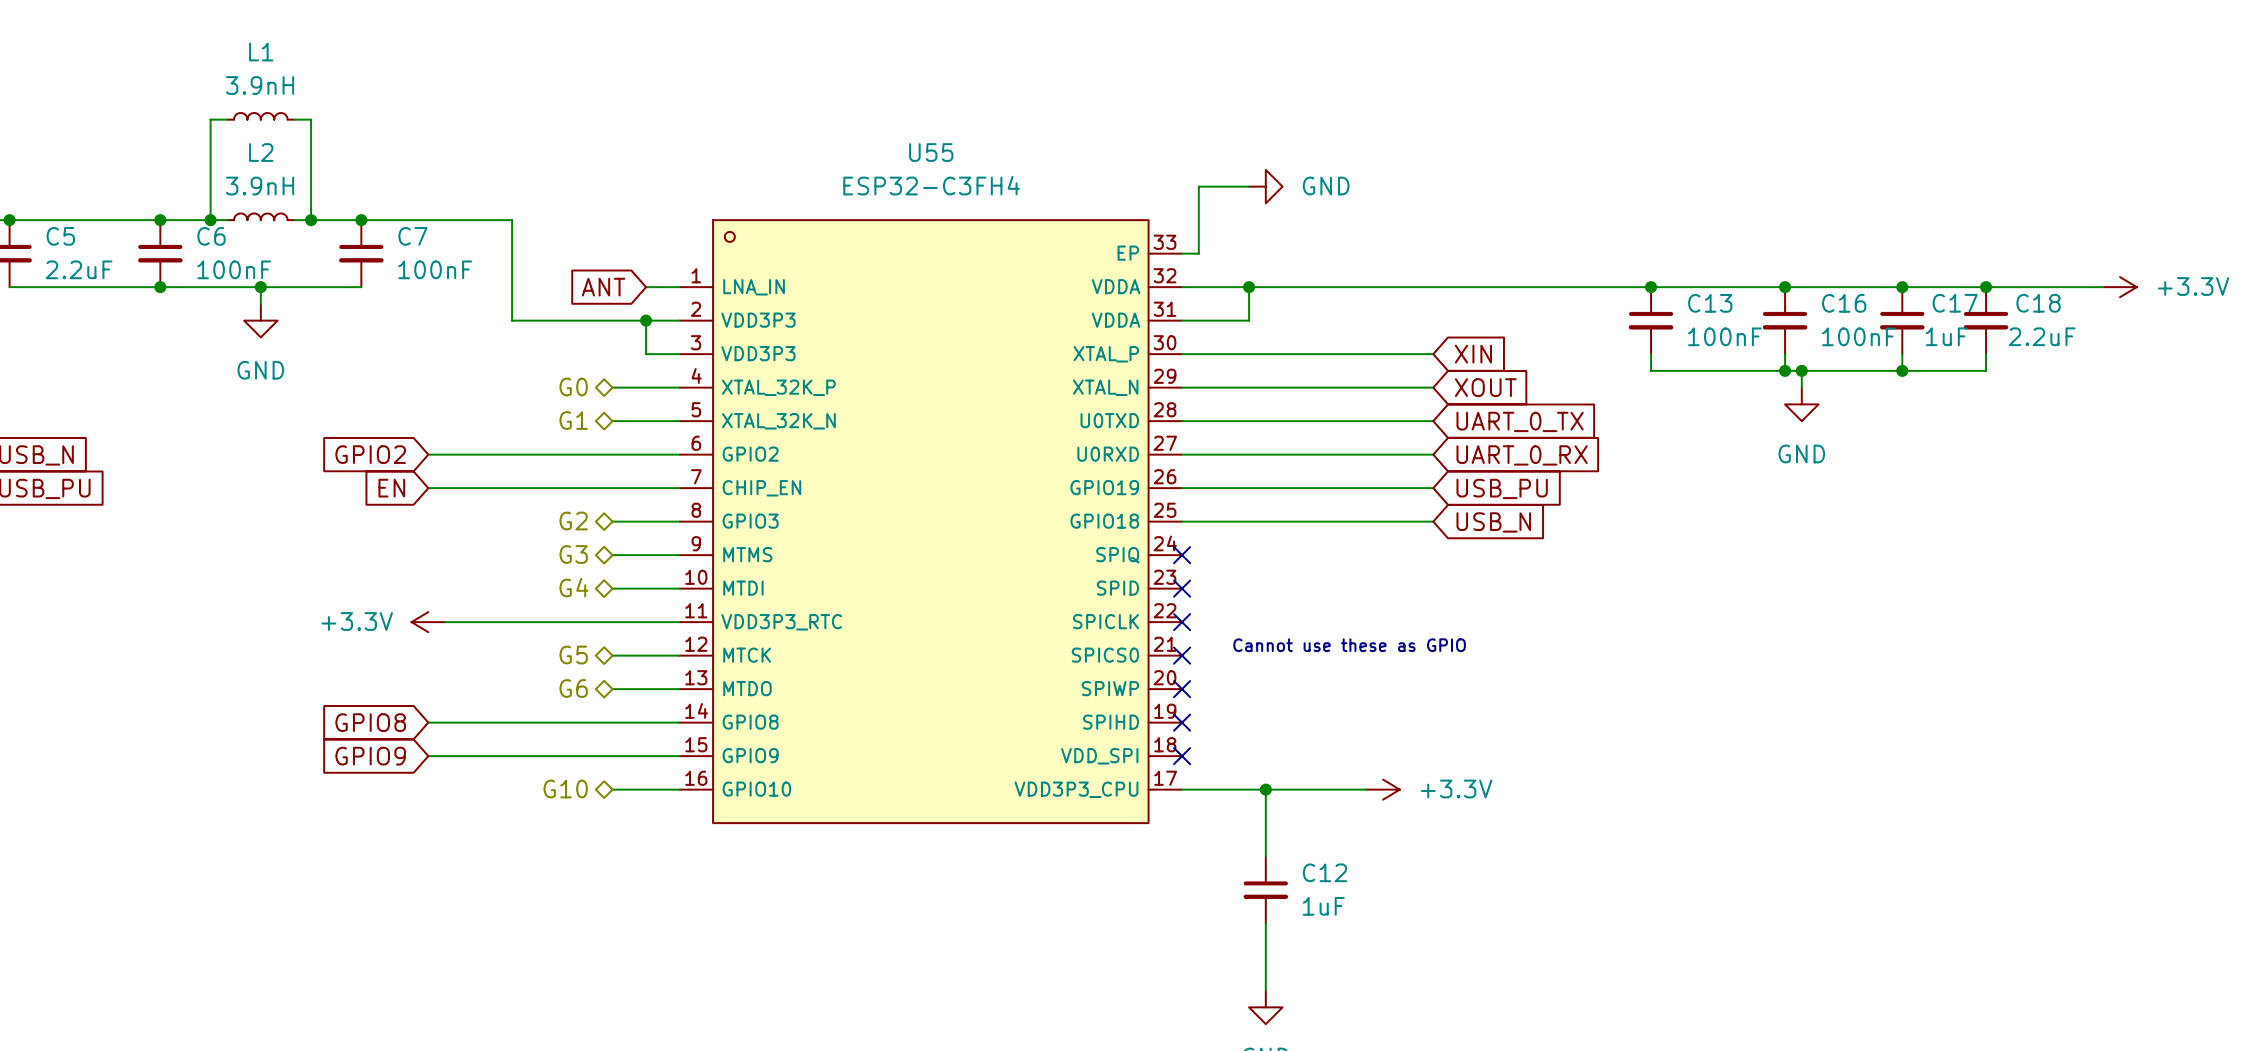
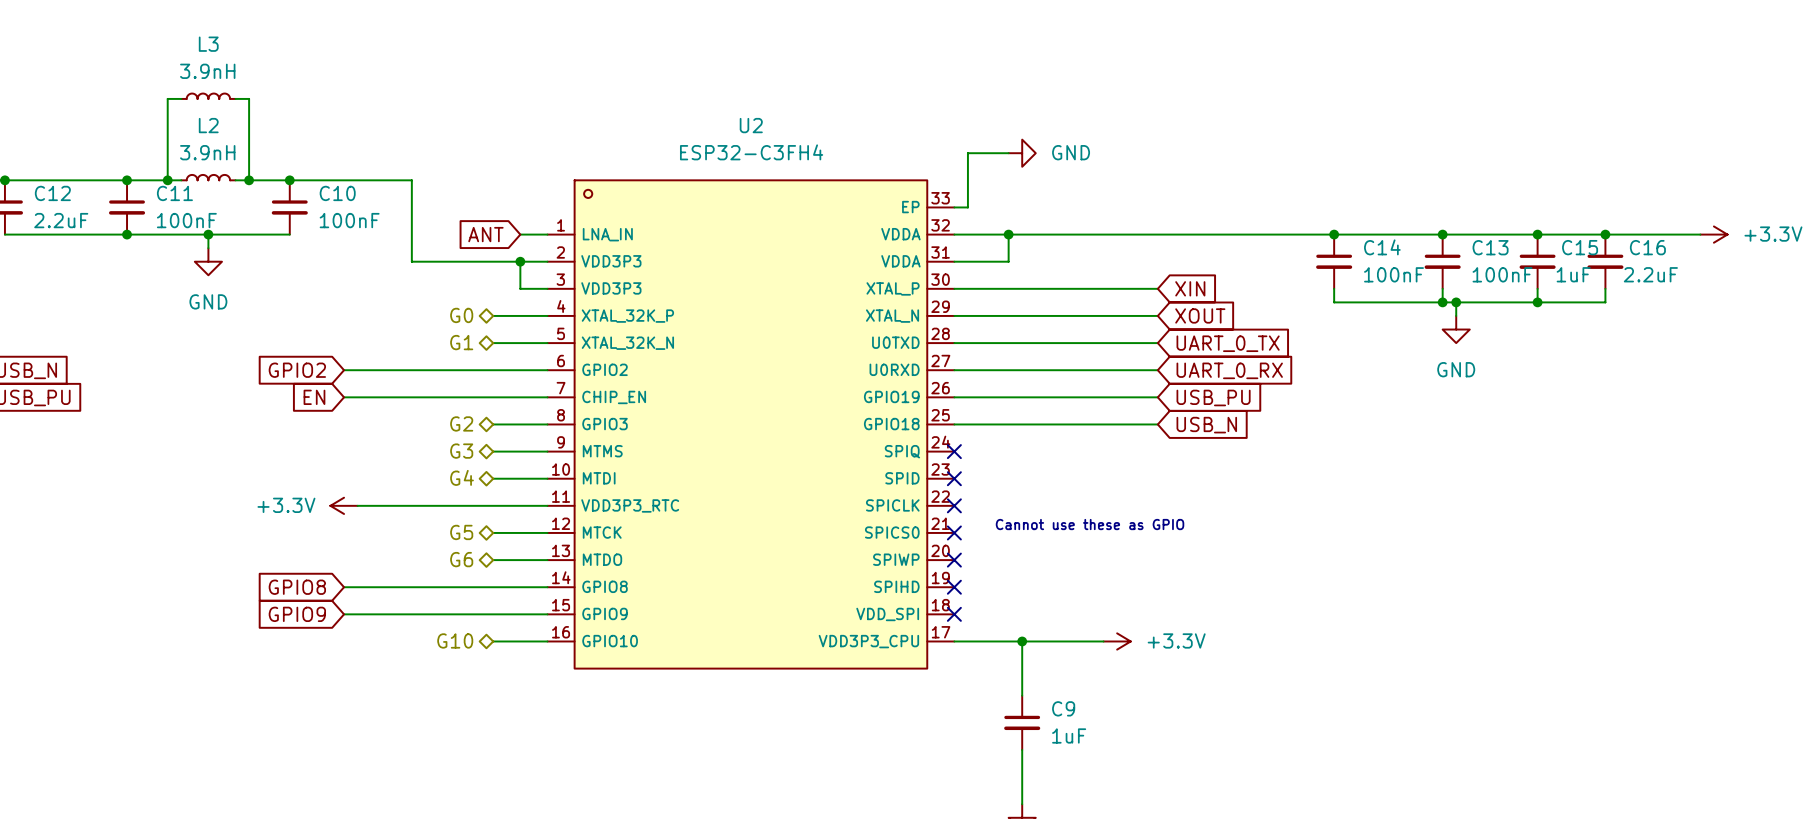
L1 name: L1 (261, 52) -> L3 (208, 44)
U55 name: U55 (931, 152) -> U2 (751, 125)
C5 name: C5 (60, 236) -> C12 (52, 193)
C6 name: C6 (211, 236) -> C11 (174, 193)
C7 name: C7 (412, 236) -> C10 (337, 193)
C13 name: C13 (1710, 303) -> C14 (1382, 247)
C16 name: C16 (1844, 303) -> C13 (1490, 247)
C17 name: C17 (1955, 303) -> C15 (1580, 247)
C18 name: C18 (2038, 303) -> C16 (1647, 247)
C12 name: C12 (1324, 872) -> C9 (1063, 708)

